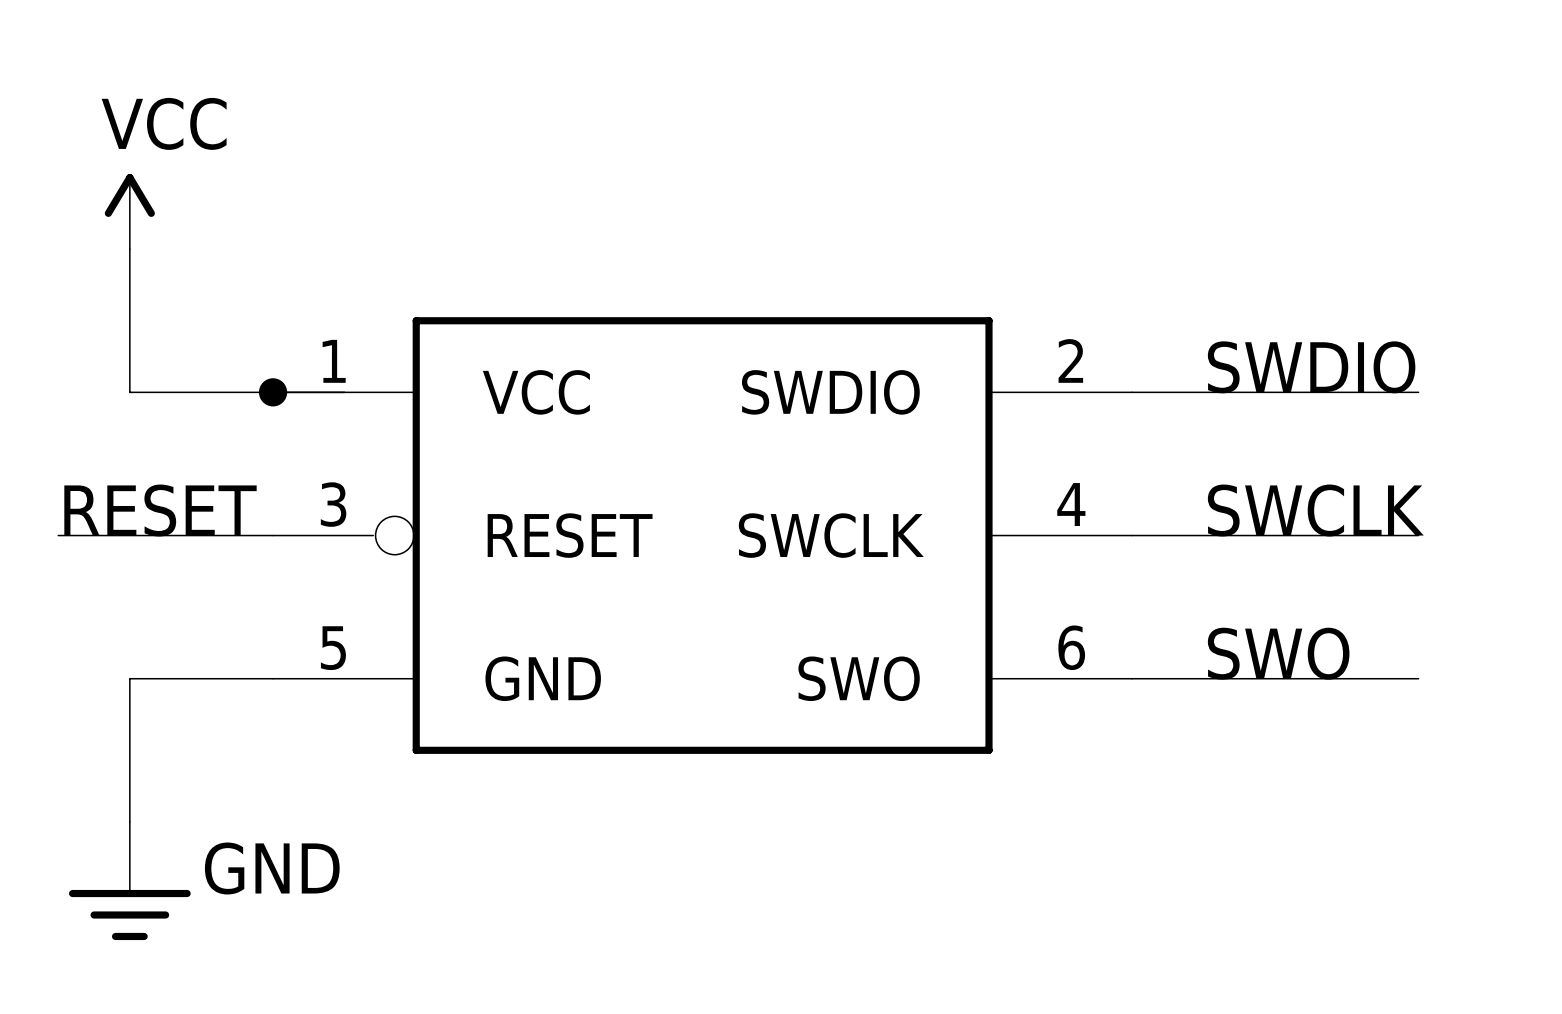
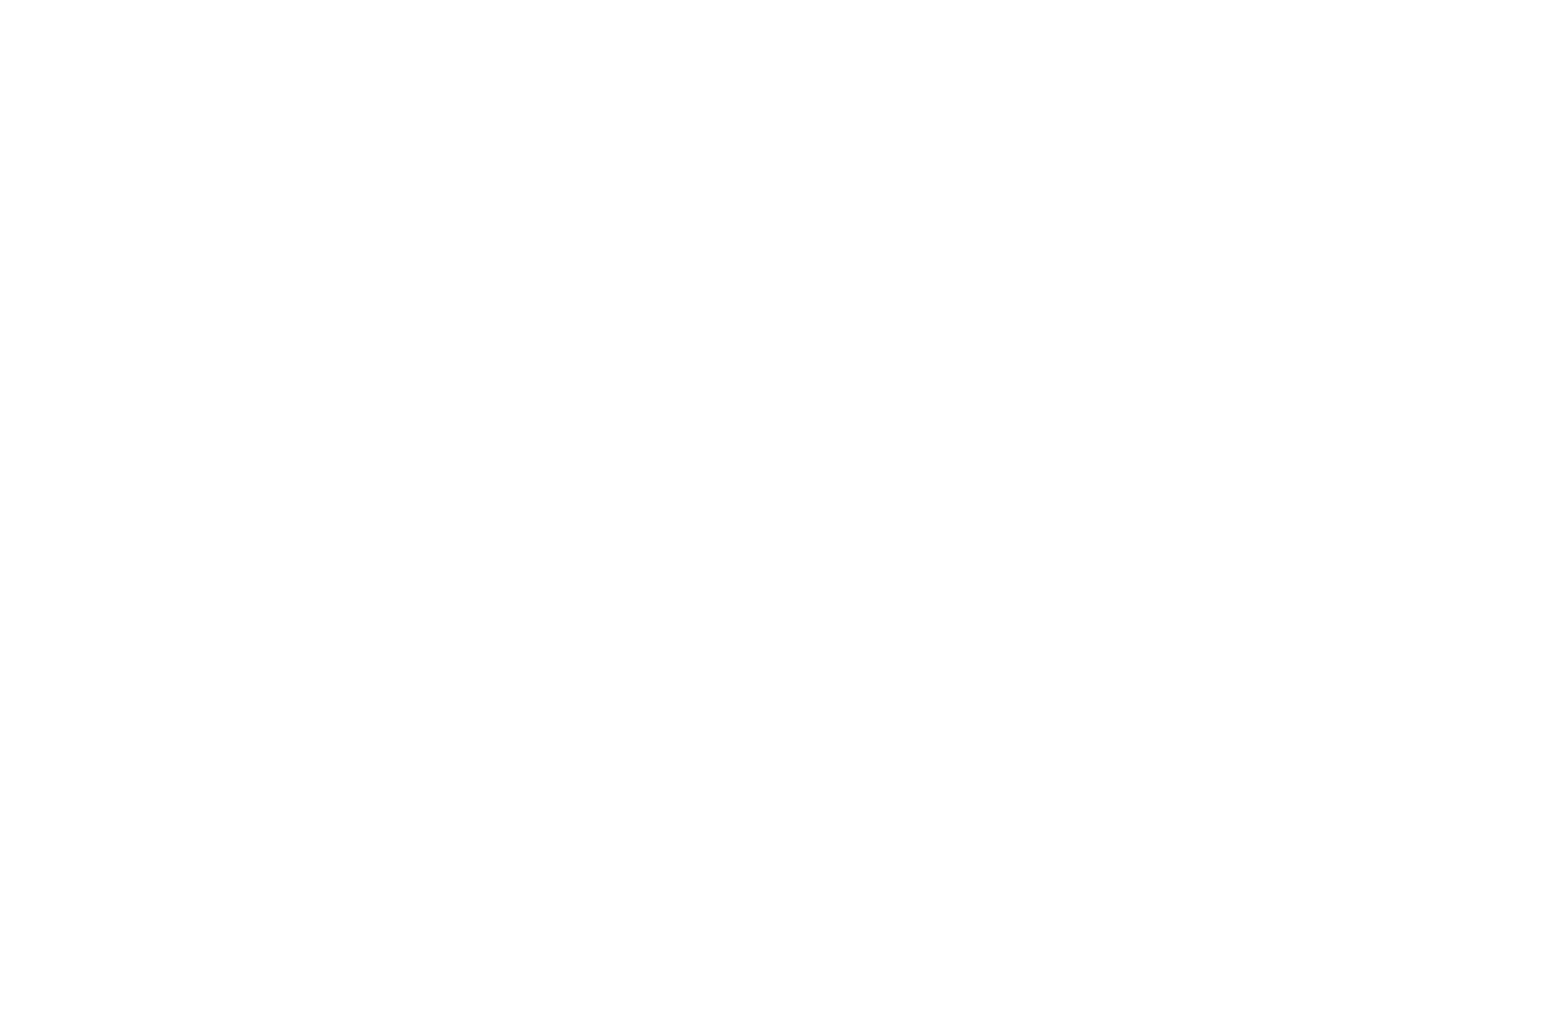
power symbol: VCC (129, 211) -> none
wire: (129, 249) (129, 392) (344, 392) -> none
label: SWDIO (1311, 367) -> none
junction: (273, 392) -> none
wire: (1132, 392) (1418, 392) -> none
label: RESET (160, 510) -> none
label: SWCLK (1315, 510) -> none
wire: (58, 535) (273, 535) -> none
part: (702, 535) -> none
wire: (1132, 535) (1418, 535) -> none
label: SWO (1278, 653) -> none
wire: (273, 678) (129, 678) (129, 821) -> none
wire: (1132, 678) (1418, 678) -> none
power symbol: GND (129, 880) -> none

